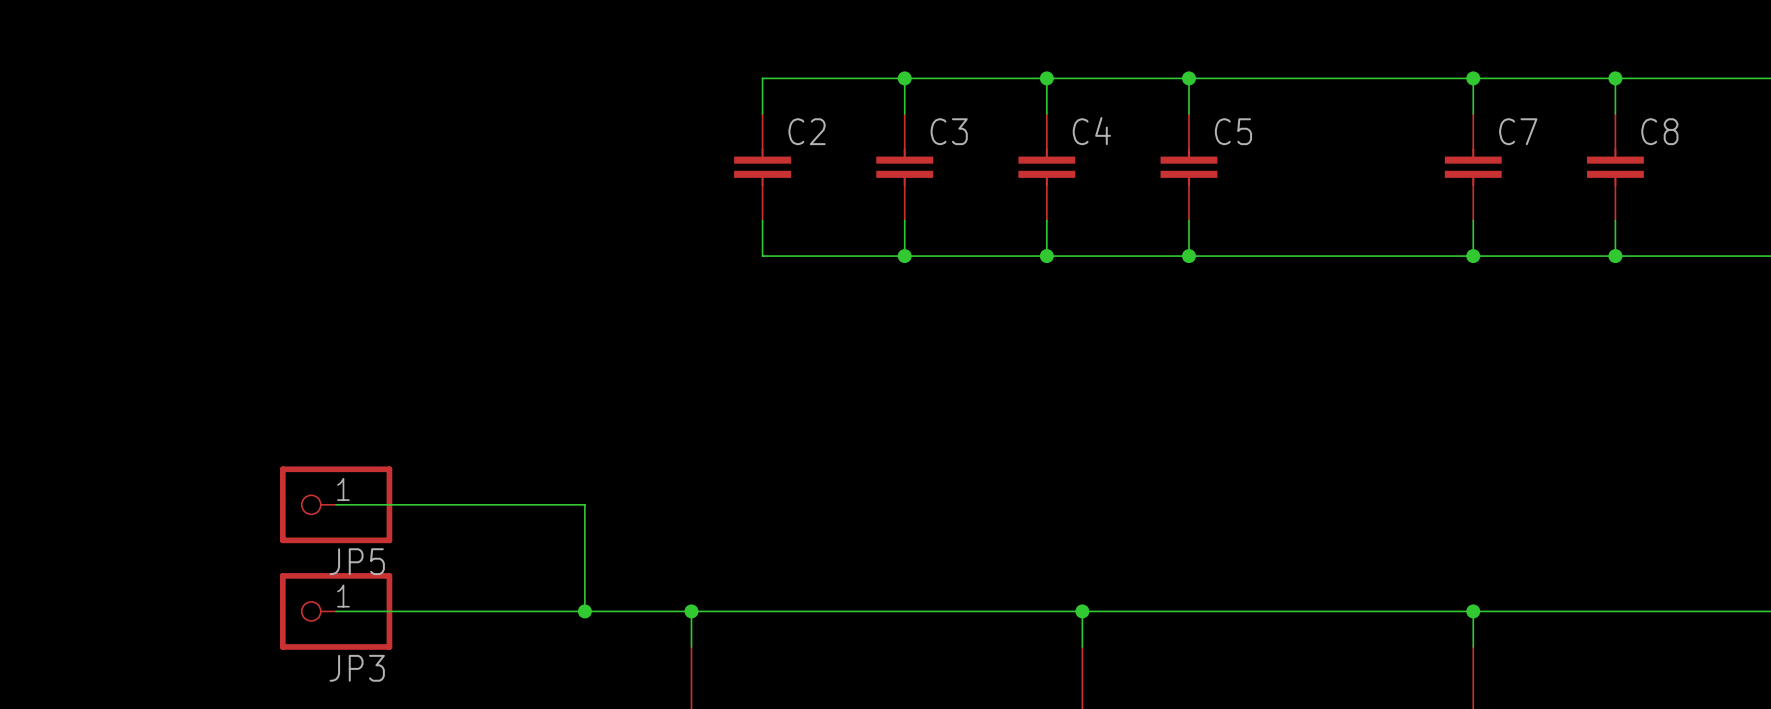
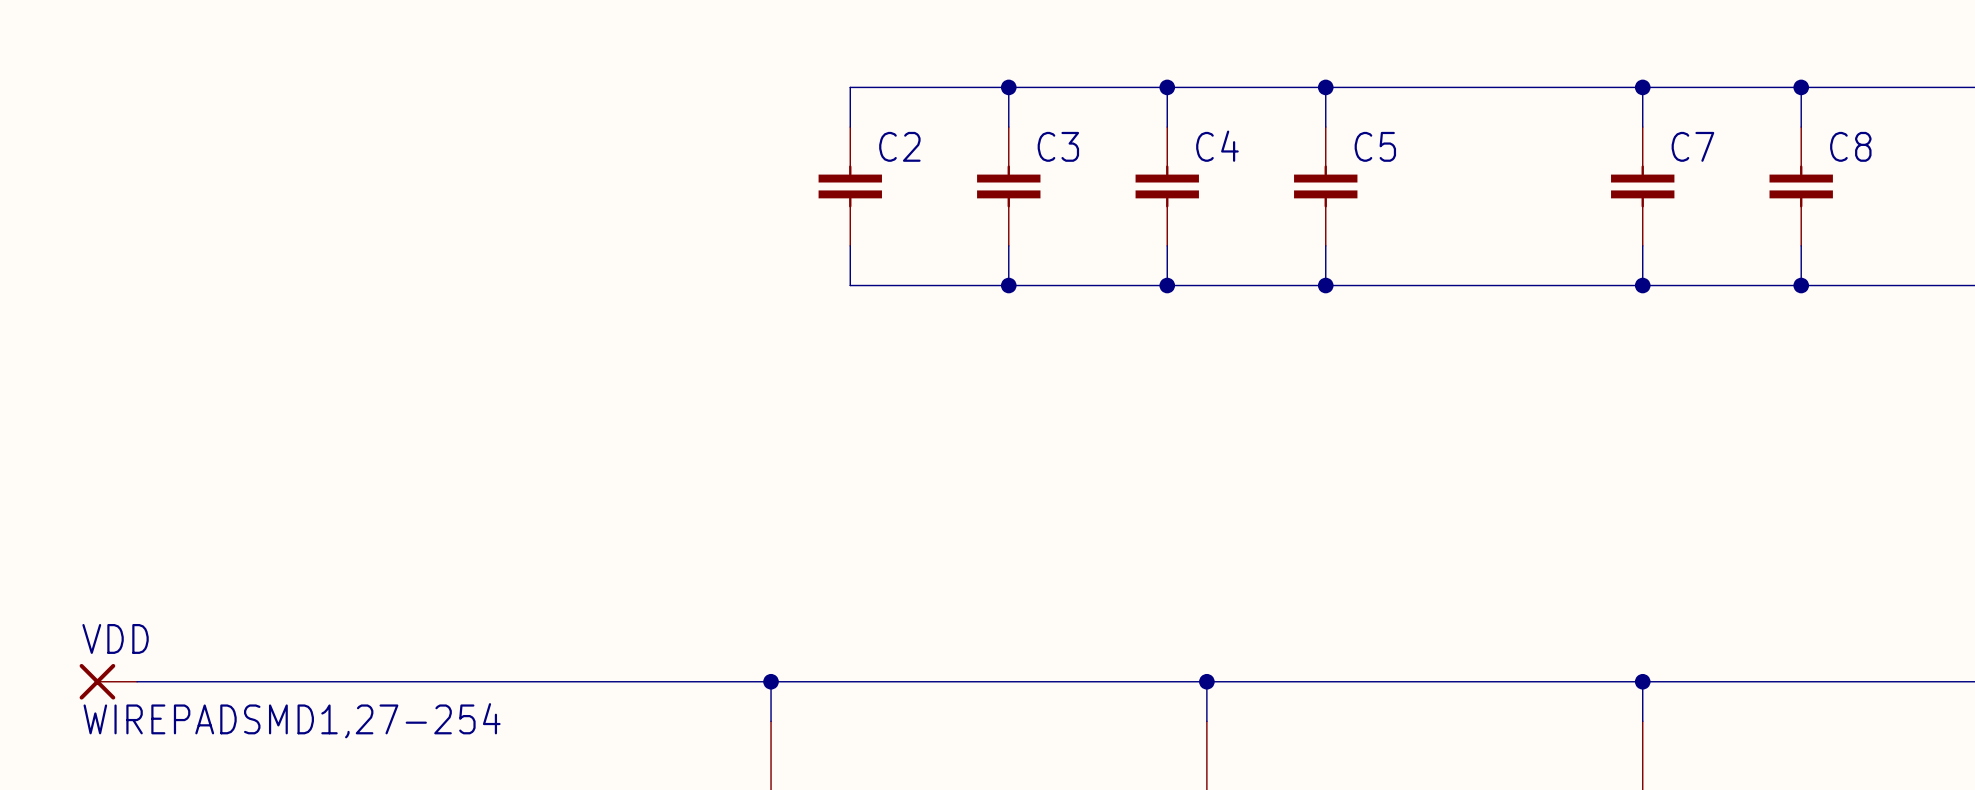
wire: (336, 504) (584, 504) (584, 611) -> none
JP5: (336, 504) -> none
VDD: none -> WIREPADSMD1,27-254 (108, 681)
wire: none -> (137, 681) (374, 681)
JP3: (336, 611) -> none
junction: (584, 611) -> none

